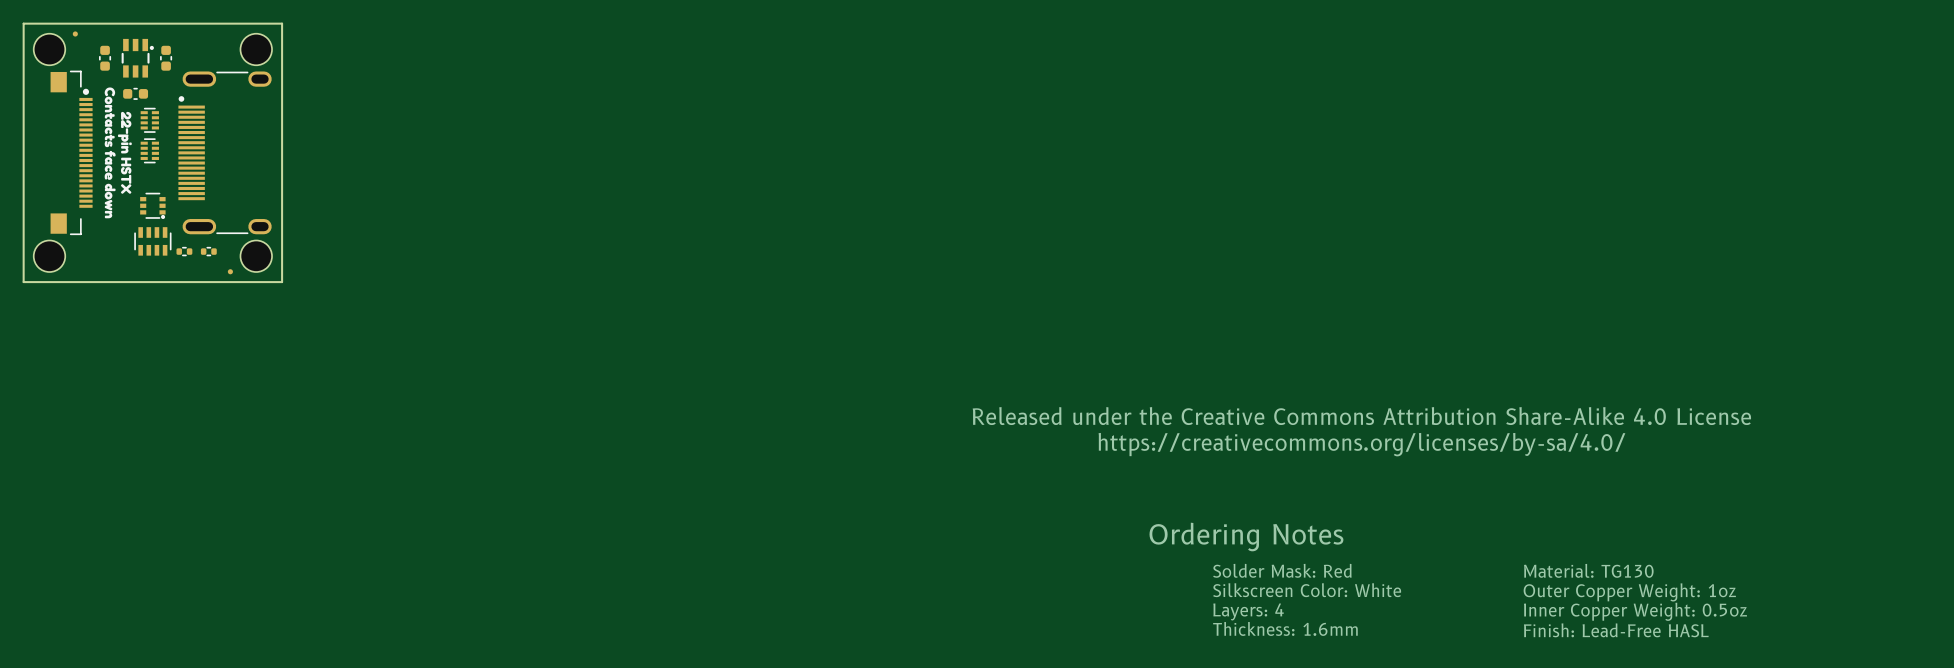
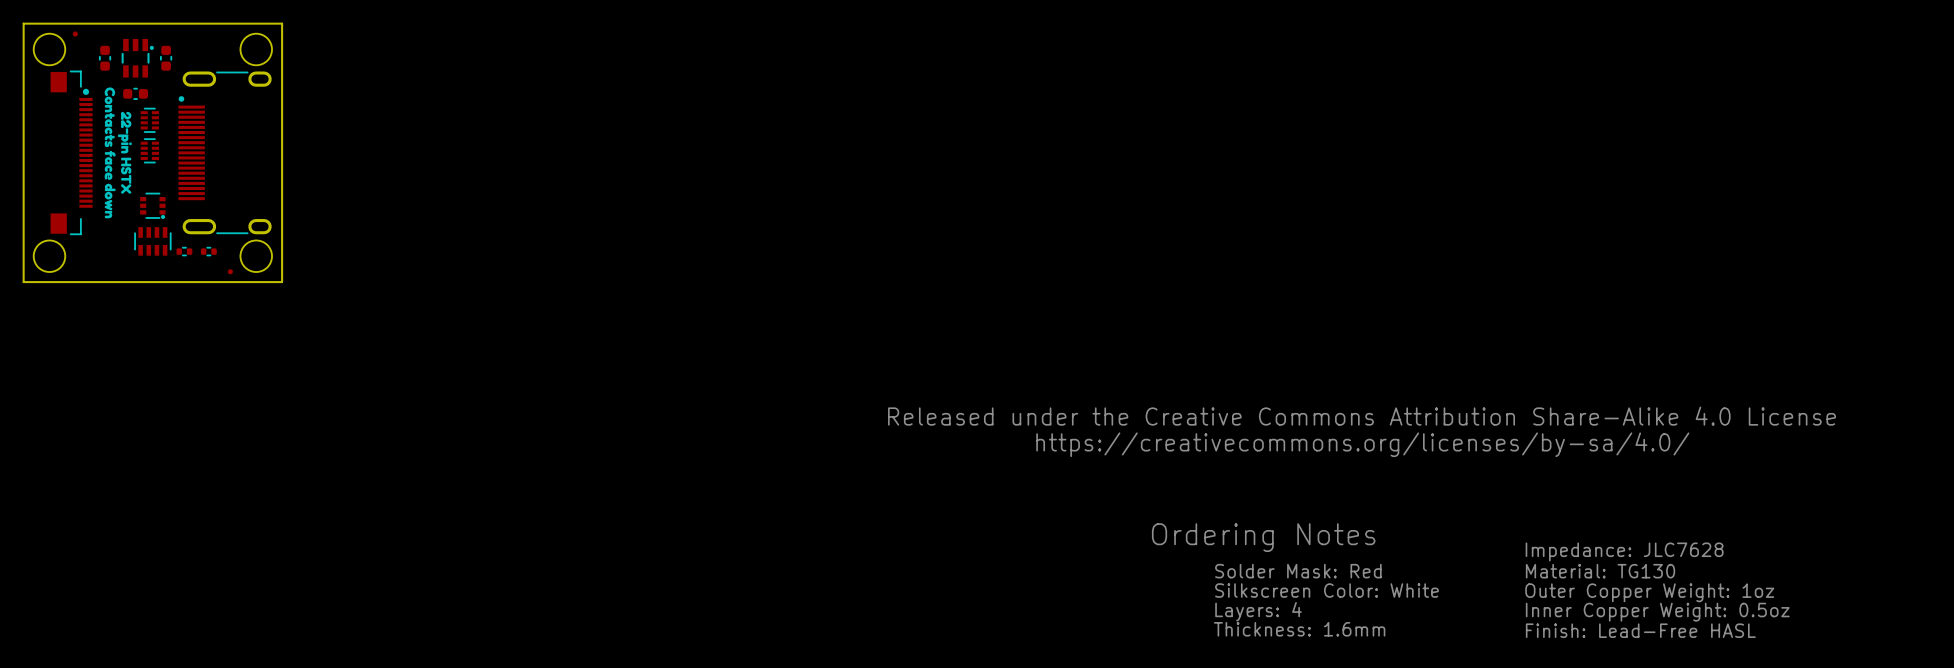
text: none -> Impedance: JLC7628 (1624, 551)

